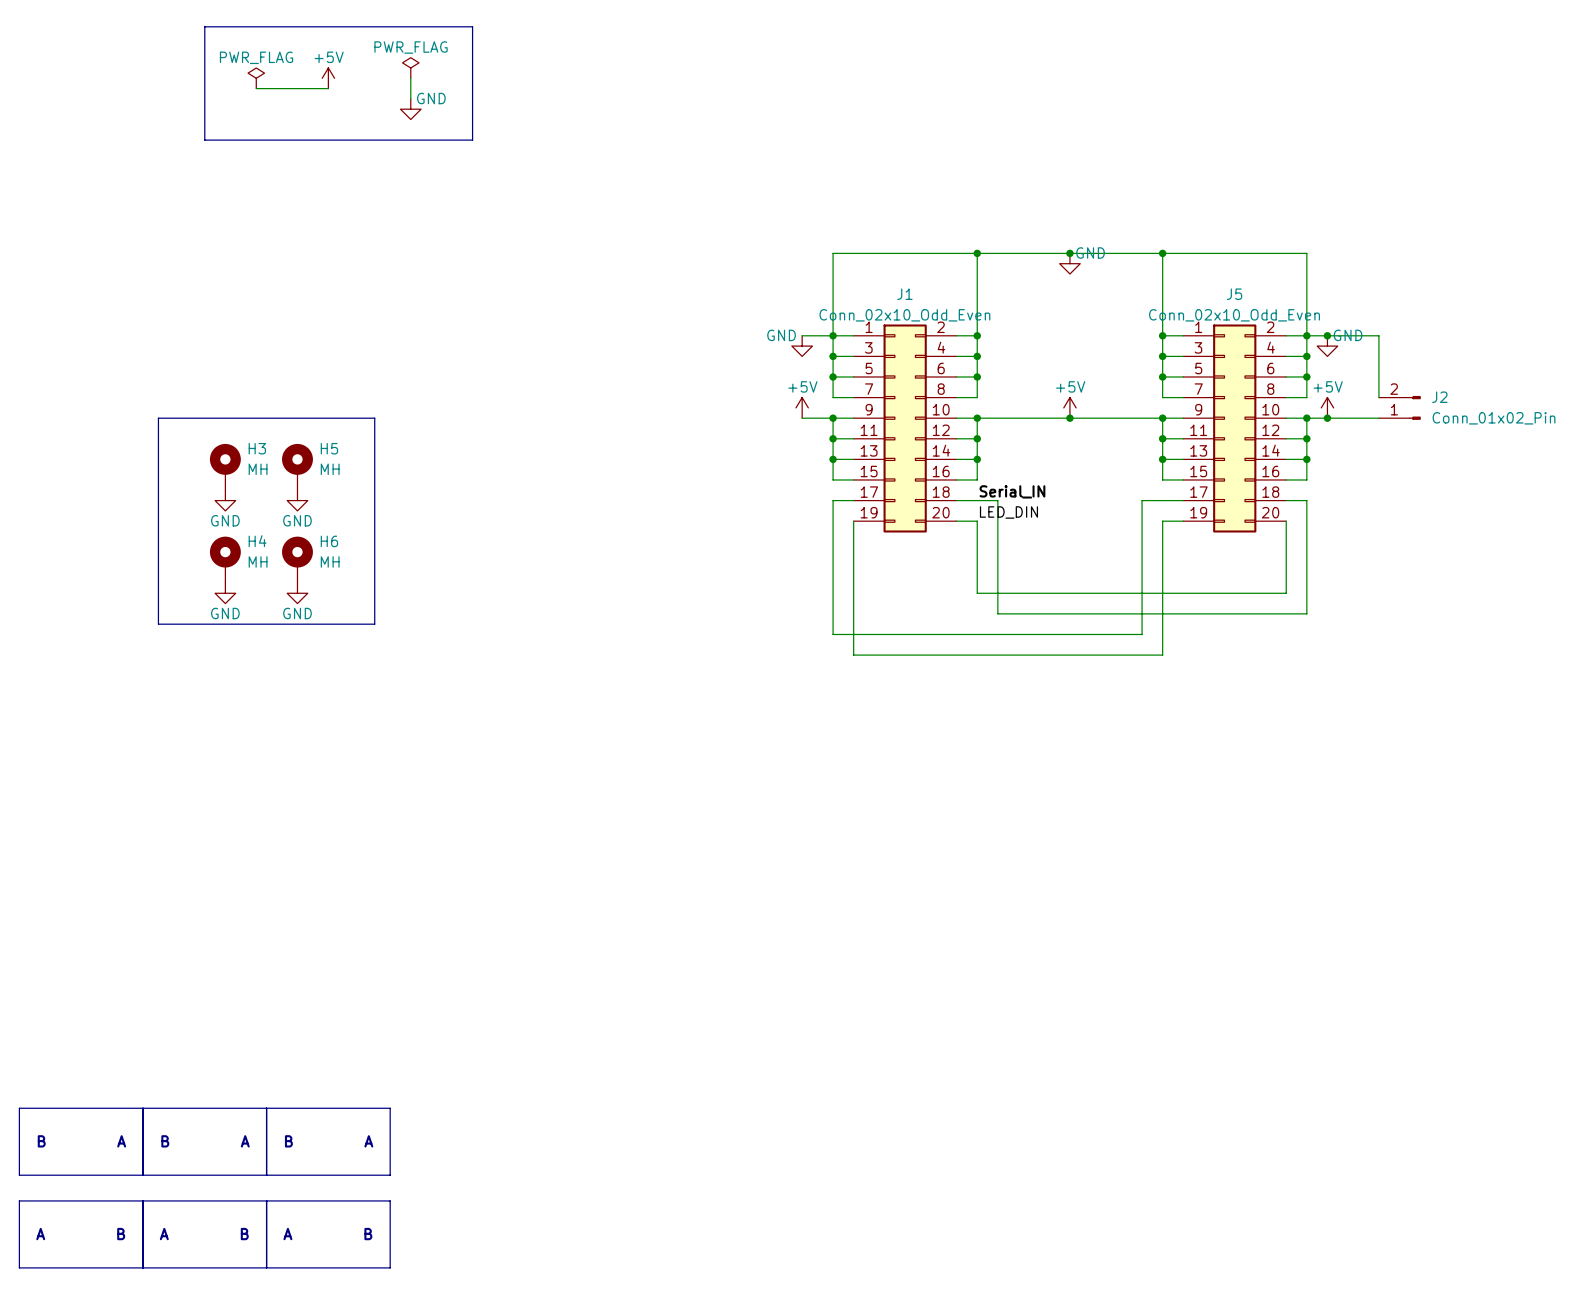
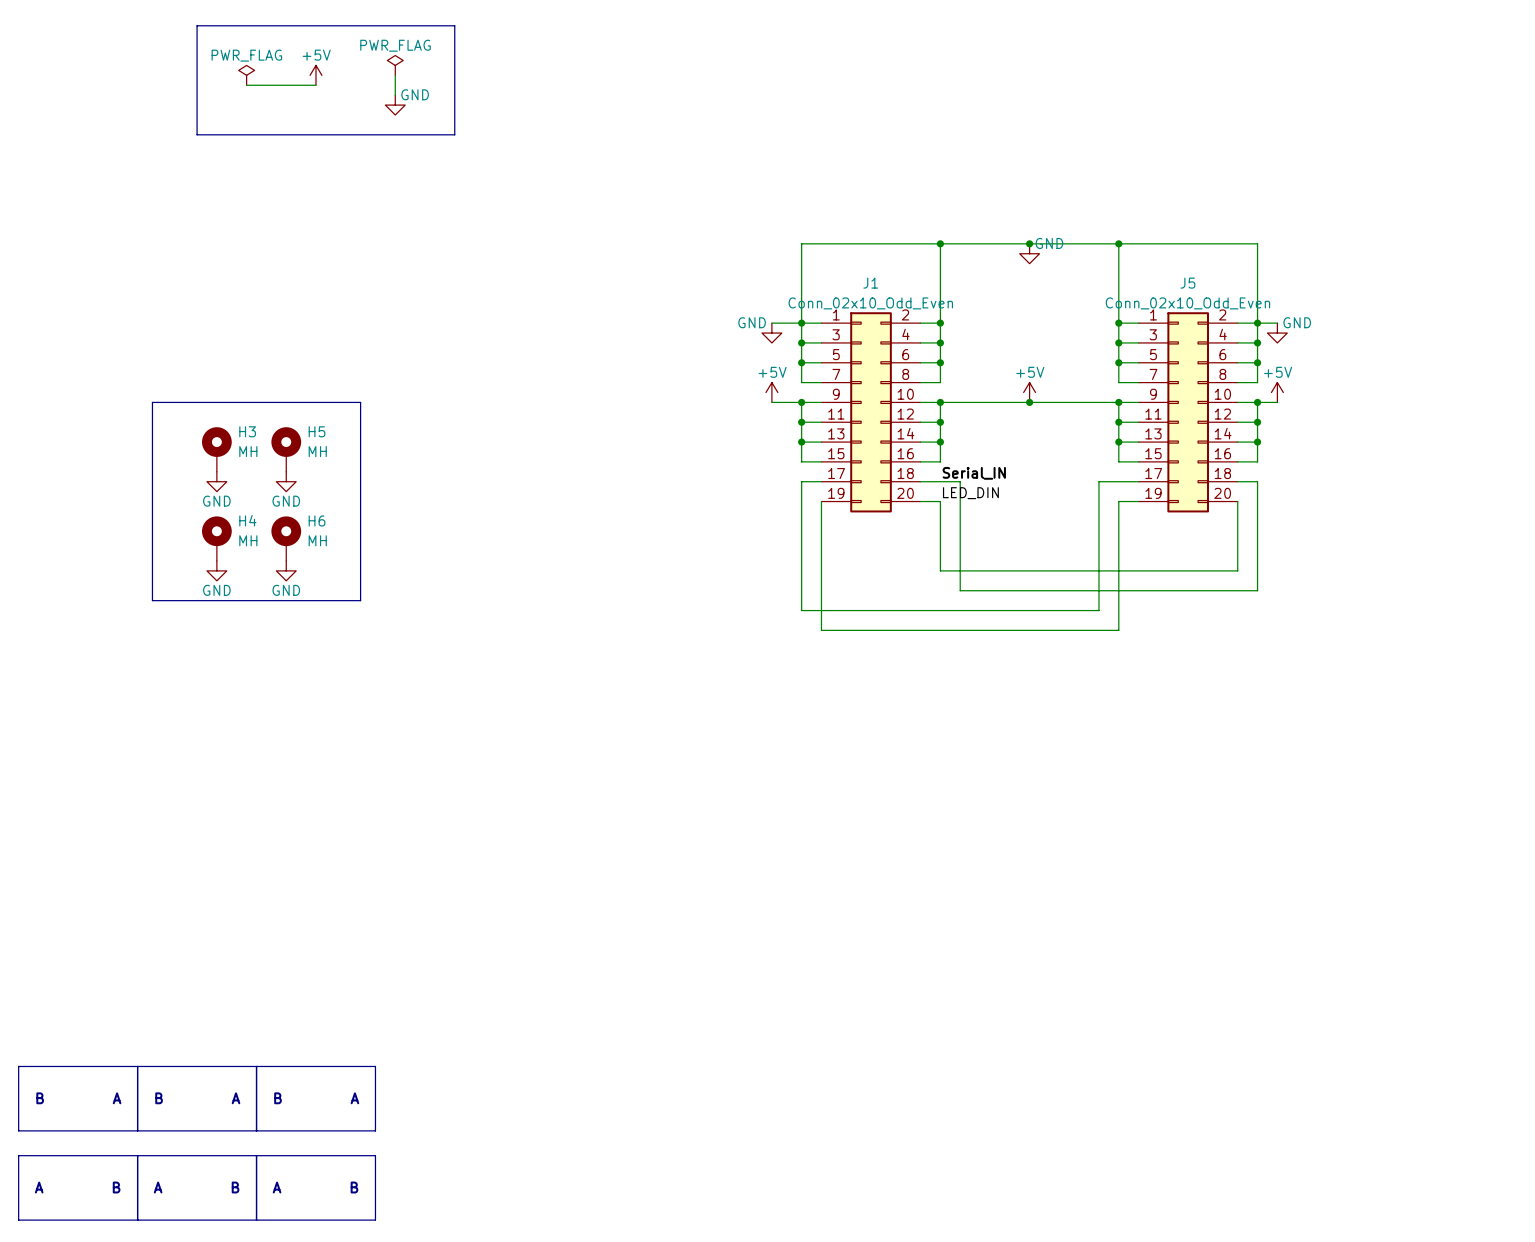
wire: (1327, 335) (1378, 335) (1378, 397) -> none
junction: (1327, 335) -> none
J2: Conn_01x02_Pin (1399, 407) -> none
wire: (1327, 418) (1378, 418) -> none
junction: (1327, 418) -> none

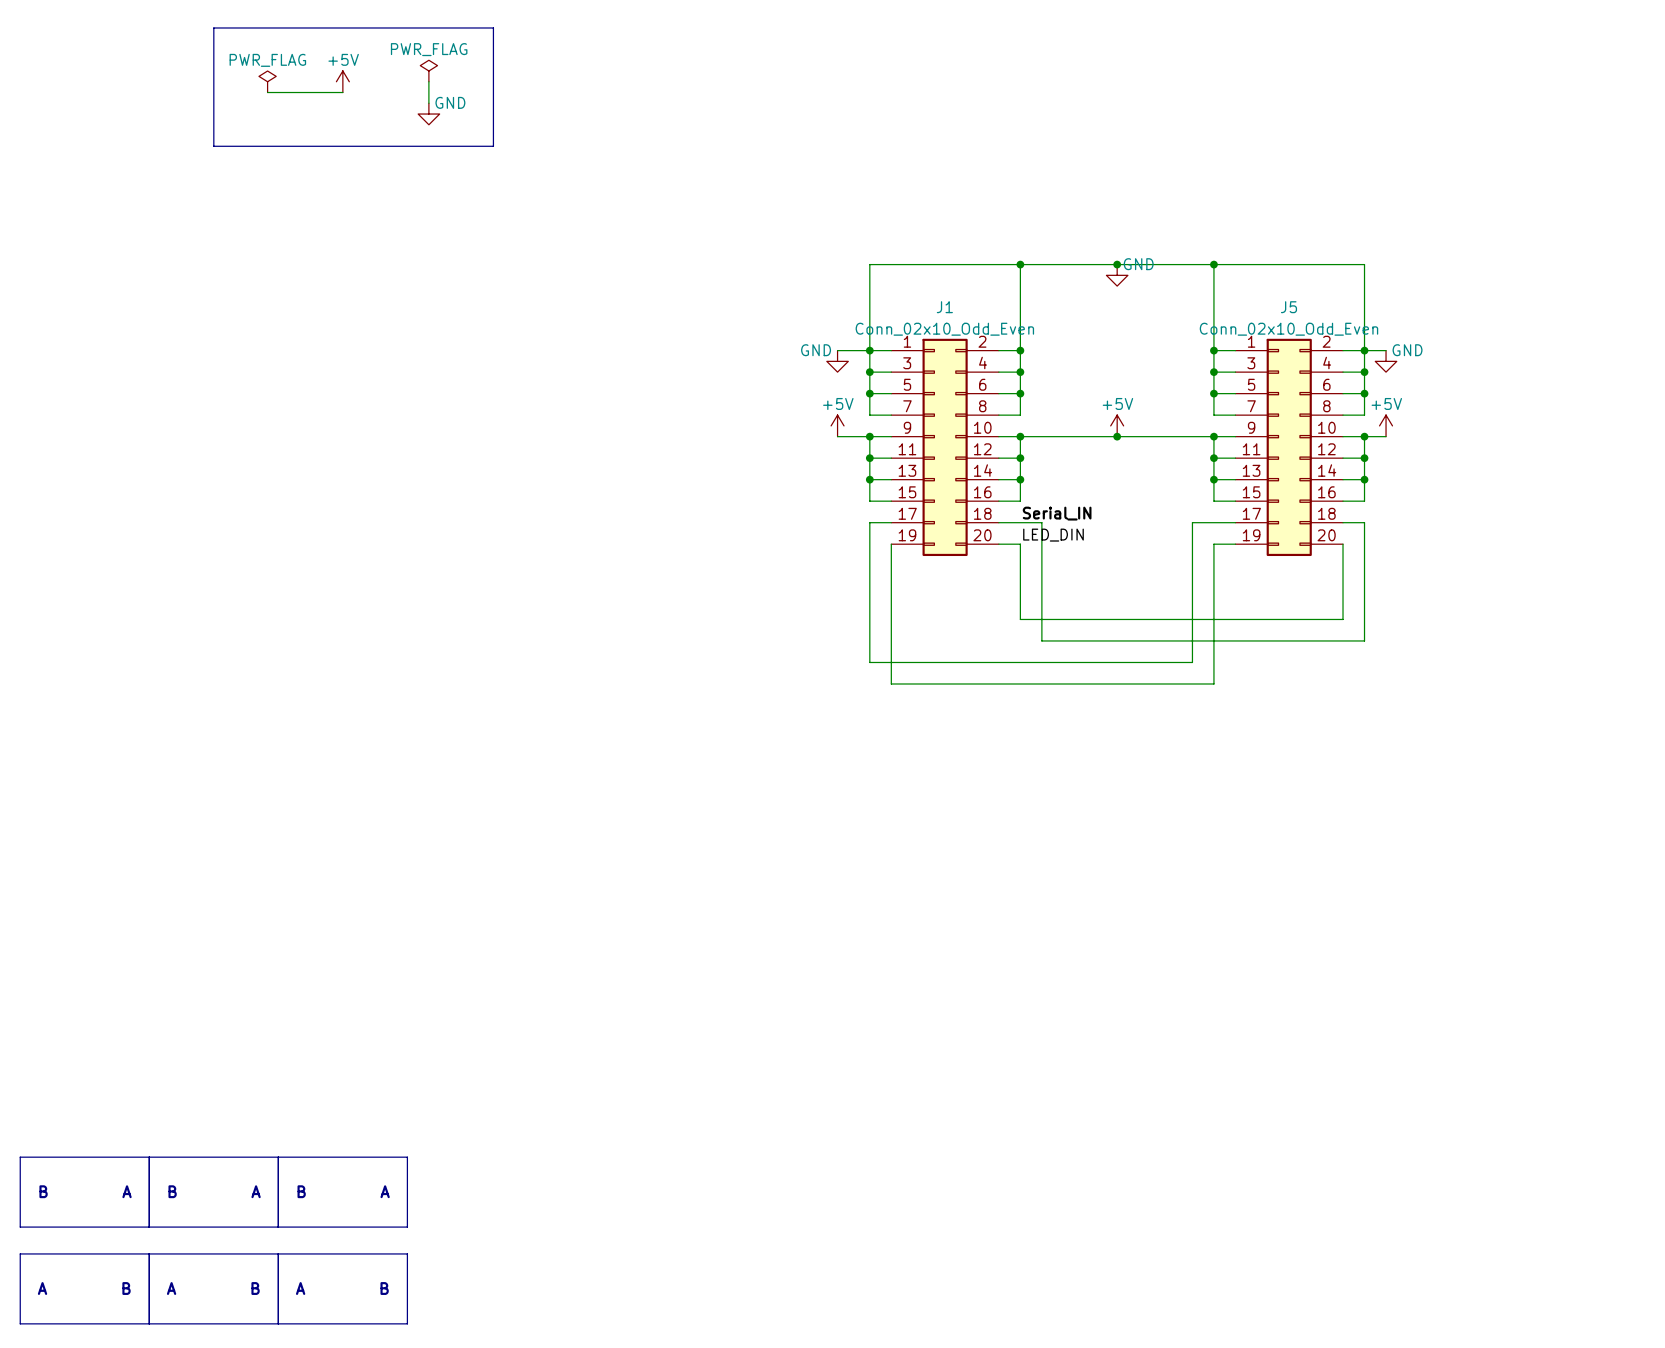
line: (152, 402) (360, 402) (360, 600) (152, 600) (152, 402) -> none
H3: MH (216, 449) -> none
H5: MH (286, 449) -> none
power symbol: GND (216, 481) -> none
power symbol: GND (286, 481) -> none
H4: MH (216, 538) -> none
H6: MH (286, 538) -> none
power symbol: GND (216, 570) -> none
power symbol: GND (286, 570) -> none

